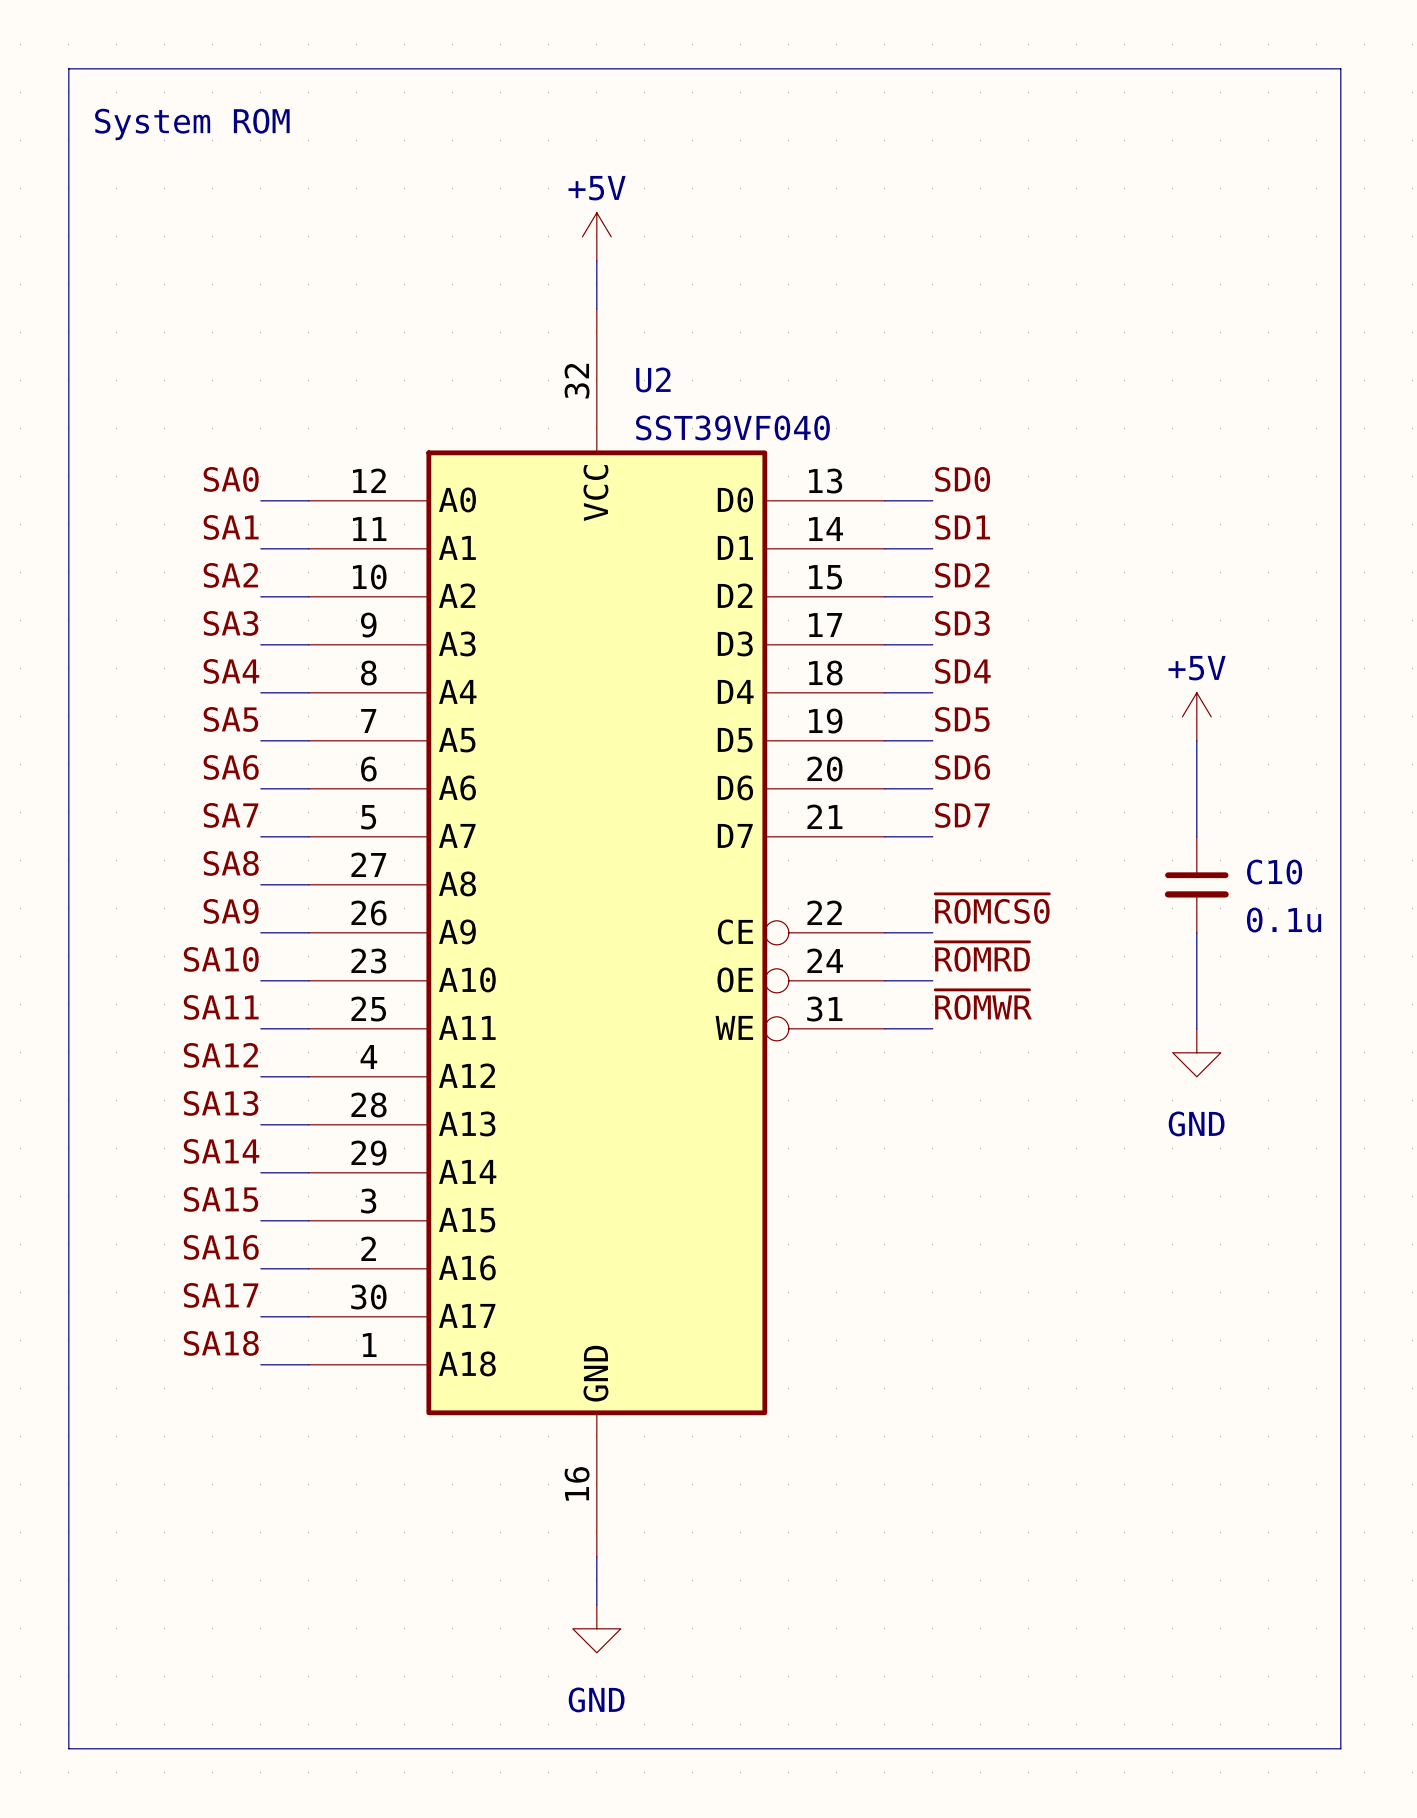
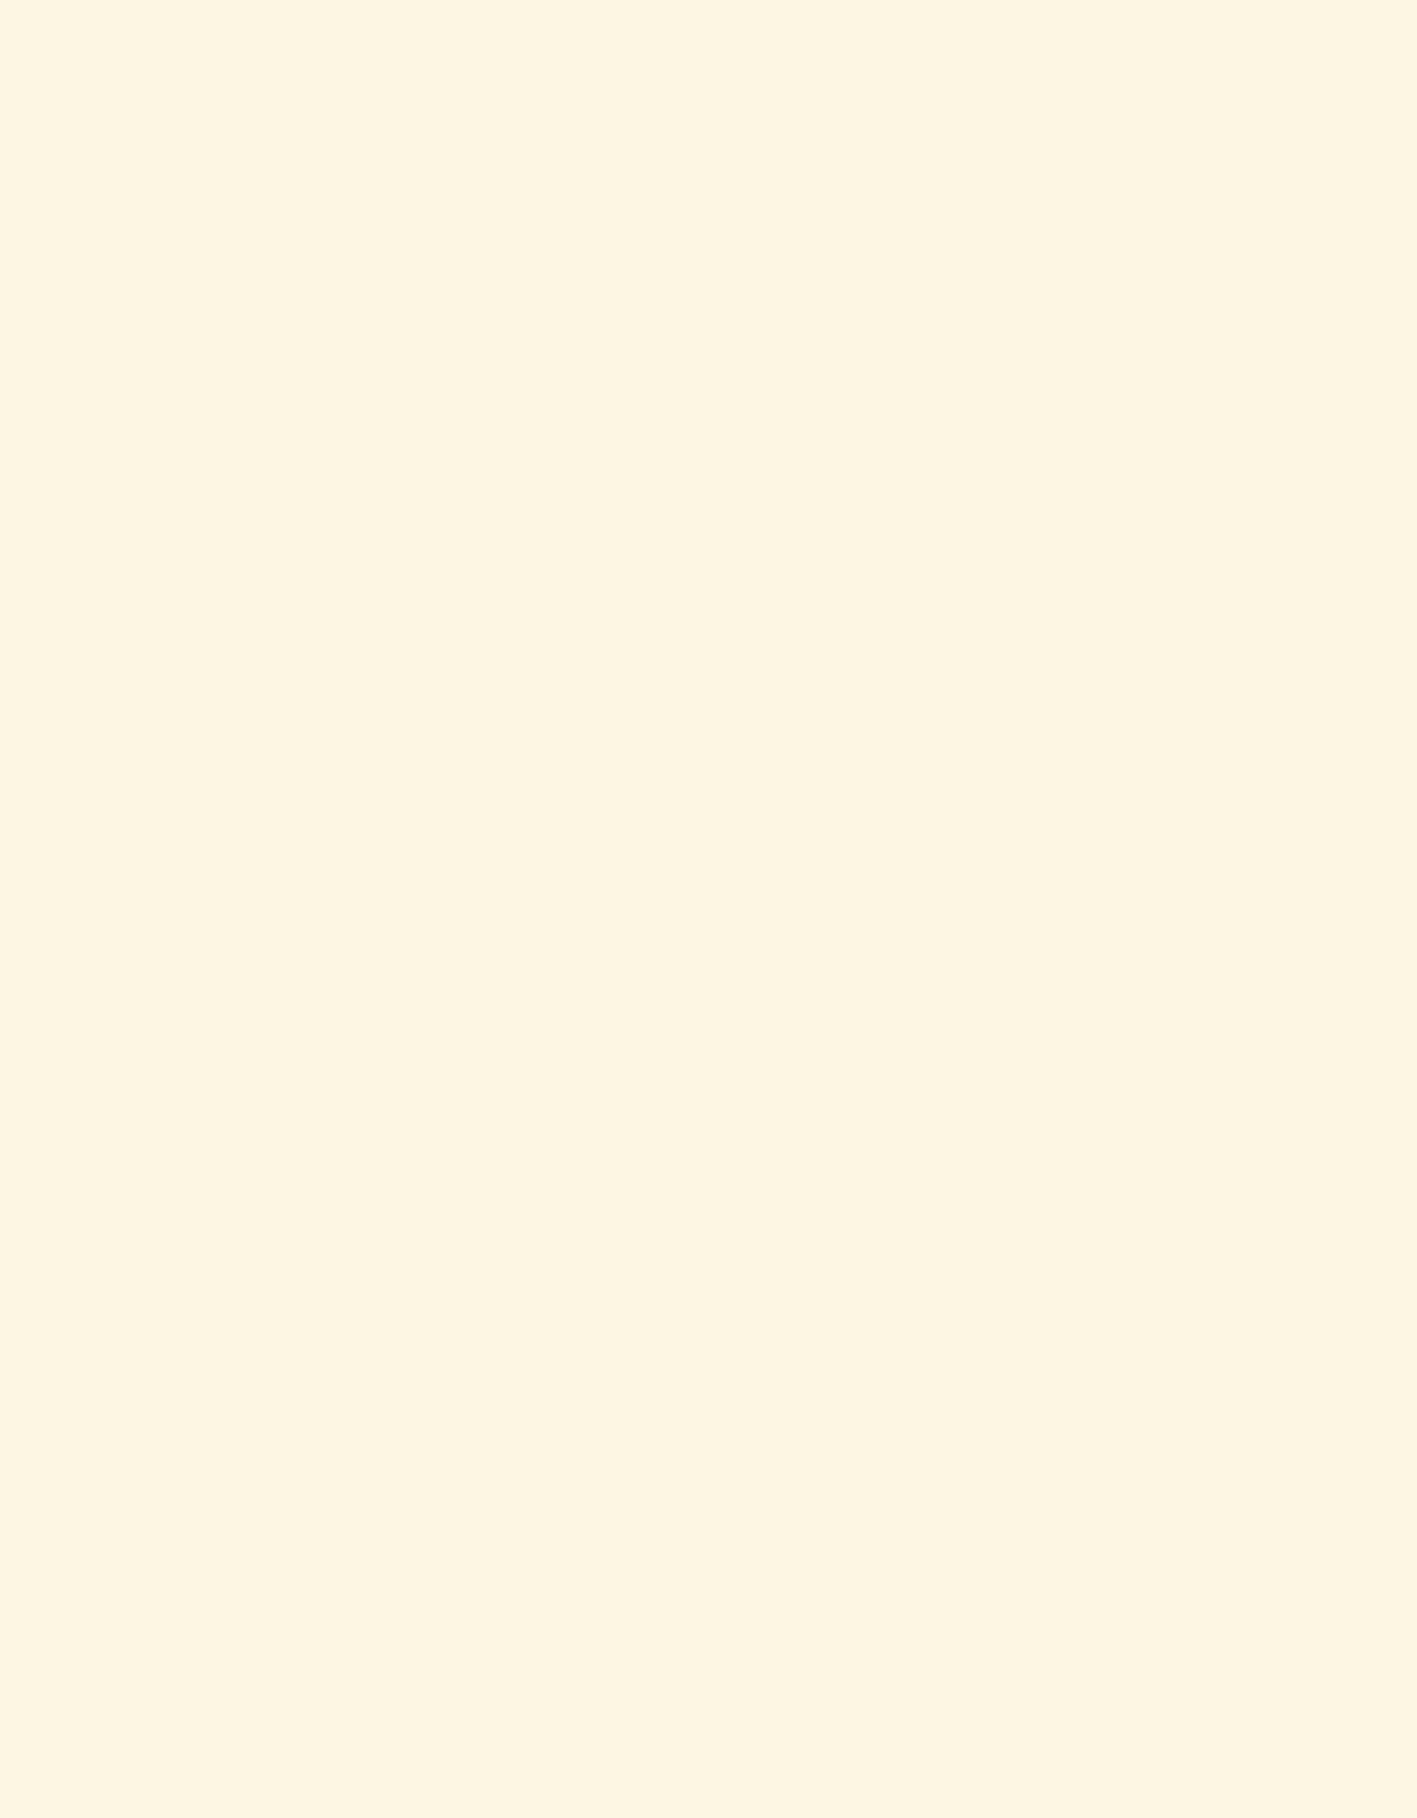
line: (68, 68) (1340, 68) (1340, 1748) (68, 1748) (68, 68) -> none
text: System ROM (192, 124) -> none
power symbol: +5V (596, 236) -> none
wire: (596, 260) (596, 308) -> none
label: SA0 (231, 479) -> none
label: SD0 (962, 479) -> none
wire: (260, 500) (308, 500) -> none
wire: (884, 500) (932, 500) -> none
label: SA1 (231, 527) -> none
label: SD1 (962, 527) -> none
wire: (260, 548) (308, 548) -> none
wire: (884, 548) (932, 548) -> none
label: SA2 (230, 575) -> none
label: SD2 (962, 575) -> none
wire: (260, 596) (308, 596) -> none
wire: (884, 596) (932, 596) -> none
label: SA3 (230, 623) -> none
label: SD3 (962, 623) -> none
wire: (260, 644) (308, 644) -> none
wire: (884, 644) (932, 644) -> none
label: SA4 (231, 671) -> none
label: SD4 (962, 671) -> none
wire: (260, 692) (308, 692) -> none
wire: (884, 692) (932, 692) -> none
power symbol: +5V (1196, 716) -> none
label: SA5 (230, 719) -> none
label: SD5 (962, 719) -> none
wire: (260, 740) (308, 740) -> none
wire: (884, 740) (932, 740) -> none
wire: (1196, 740) (1196, 836) -> none
label: SA6 (231, 767) -> none
label: SD6 (962, 767) -> none
wire: (260, 788) (308, 788) -> none
wire: (884, 788) (932, 788) -> none
label: SA7 (230, 815) -> none
label: SD7 (962, 815) -> none
wire: (260, 836) (308, 836) -> none
wire: (884, 836) (932, 836) -> none
label: SA8 (231, 863) -> none
wire: (260, 884) (308, 884) -> none
C10: 0.1u (1196, 884) -> none
label: ~{ROMCS0} (992, 908) -> none
label: SA9 (231, 911) -> none
wire: (260, 932) (308, 932) -> none
U2: SST39VF040 (596, 932) -> none
wire: (884, 932) (932, 932) -> none
wire: (1196, 932) (1196, 1028) -> none
label: ~{ROMRD} (982, 956) -> none
label: SA10 (221, 959) -> none
wire: (260, 980) (308, 980) -> none
wire: (884, 980) (932, 980) -> none
label: ~{ROMWR} (983, 1004) -> none
label: SA11 (221, 1007) -> none
wire: (260, 1028) (308, 1028) -> none
wire: (884, 1028) (932, 1028) -> none
power symbol: GND (1196, 1052) -> none
label: SA12 (220, 1055) -> none
wire: (260, 1076) (308, 1076) -> none
label: SA13 (221, 1103) -> none
wire: (260, 1124) (308, 1124) -> none
label: SA14 (221, 1151) -> none
wire: (260, 1172) (308, 1172) -> none
label: SA15 (221, 1199) -> none
wire: (260, 1220) (308, 1220) -> none
label: SA16 (221, 1247) -> none
wire: (260, 1268) (308, 1268) -> none
label: SA17 (221, 1295) -> none
wire: (260, 1316) (308, 1316) -> none
label: SA18 (221, 1343) -> none
wire: (260, 1364) (308, 1364) -> none
wire: (596, 1556) (596, 1604) -> none
power symbol: GND (596, 1628) -> none

